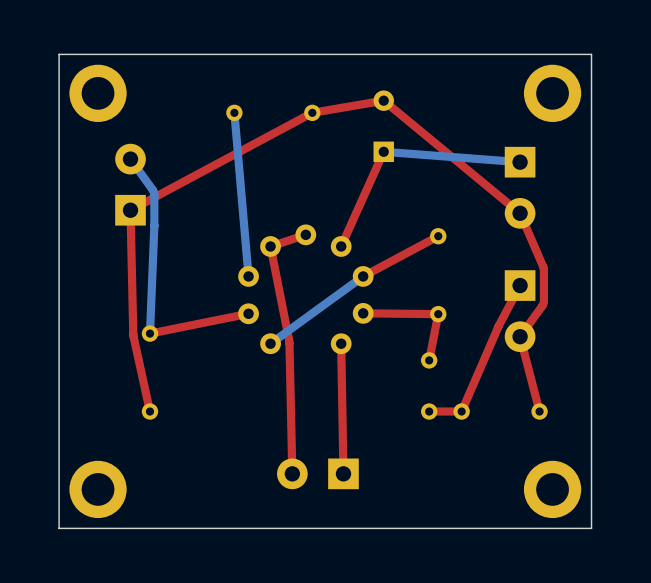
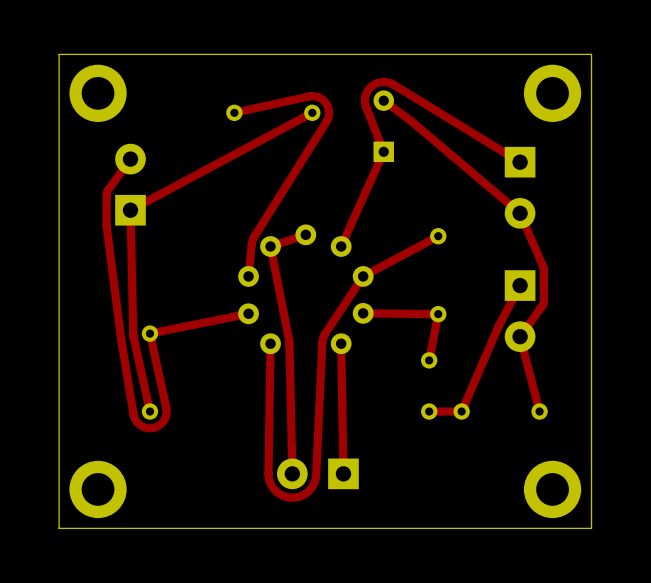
top track: none -> (234, 112) (313, 96) (323, 100) (328, 111) (326, 121) (253, 238) (248, 276)
bottom track: (234, 112) (248, 276) -> none
top track: (312, 112) (383, 100) (520, 213) -> (383, 100) (411, 121) (520, 213)
top track: none -> (383, 151) (364, 100) (369, 87) (377, 82) (384, 81) (393, 84) (520, 162)
bottom track: (383, 151) (520, 162) -> none
top track: none -> (130, 159) (107, 192) (106, 226) (121, 338) (133, 414) (138, 423) (149, 428) (160, 424) (166, 412) (149, 333)
bottom track: (130, 159) (154, 194) (149, 333) -> none
top track: none -> (363, 276) (323, 337) (315, 478) (310, 489) (297, 497) (288, 497) (279, 494) (271, 485) (268, 476) (270, 343)
bottom track: (363, 276) (270, 343) -> none

